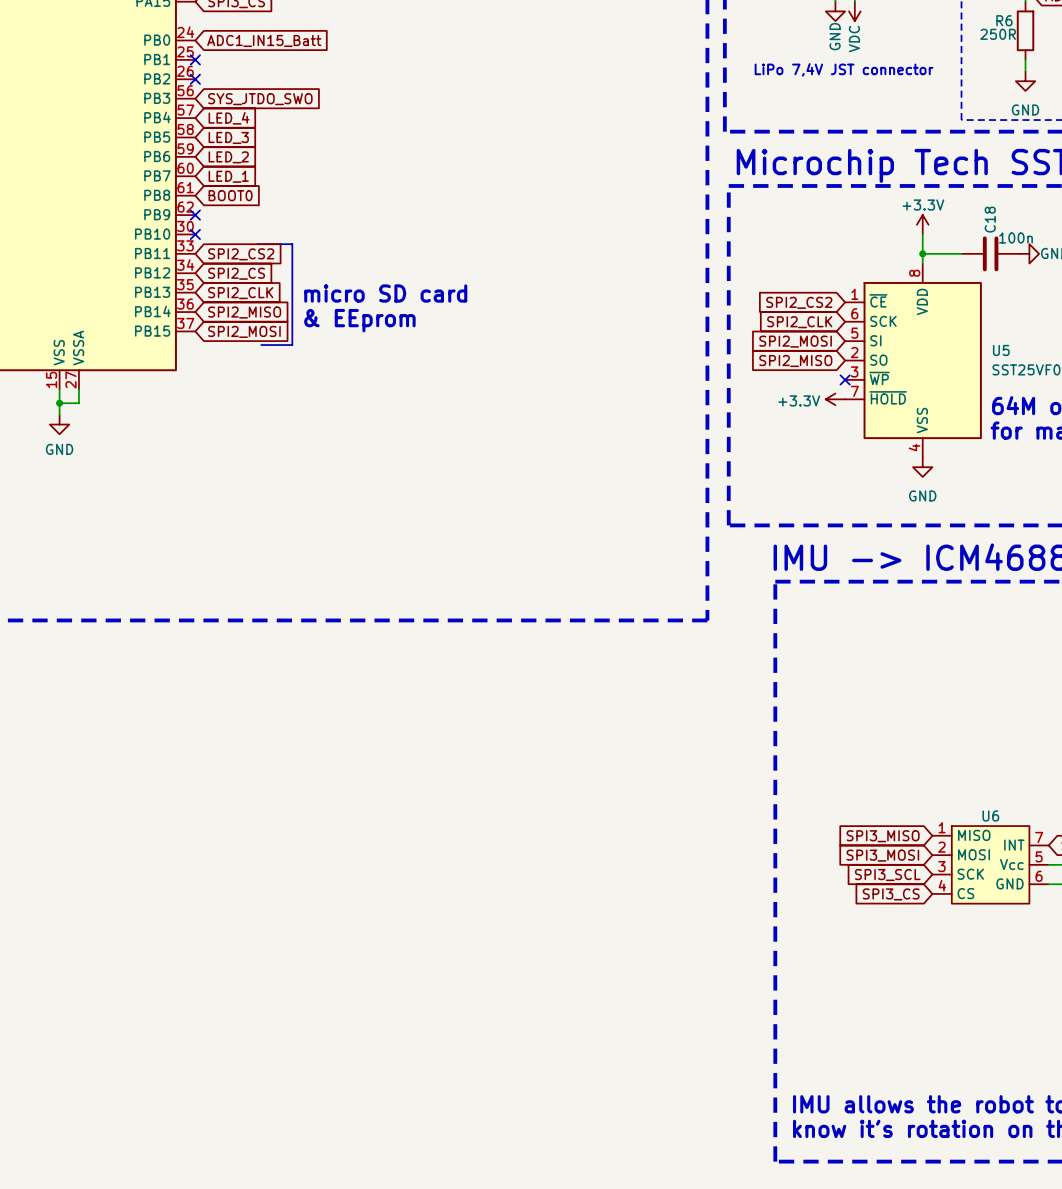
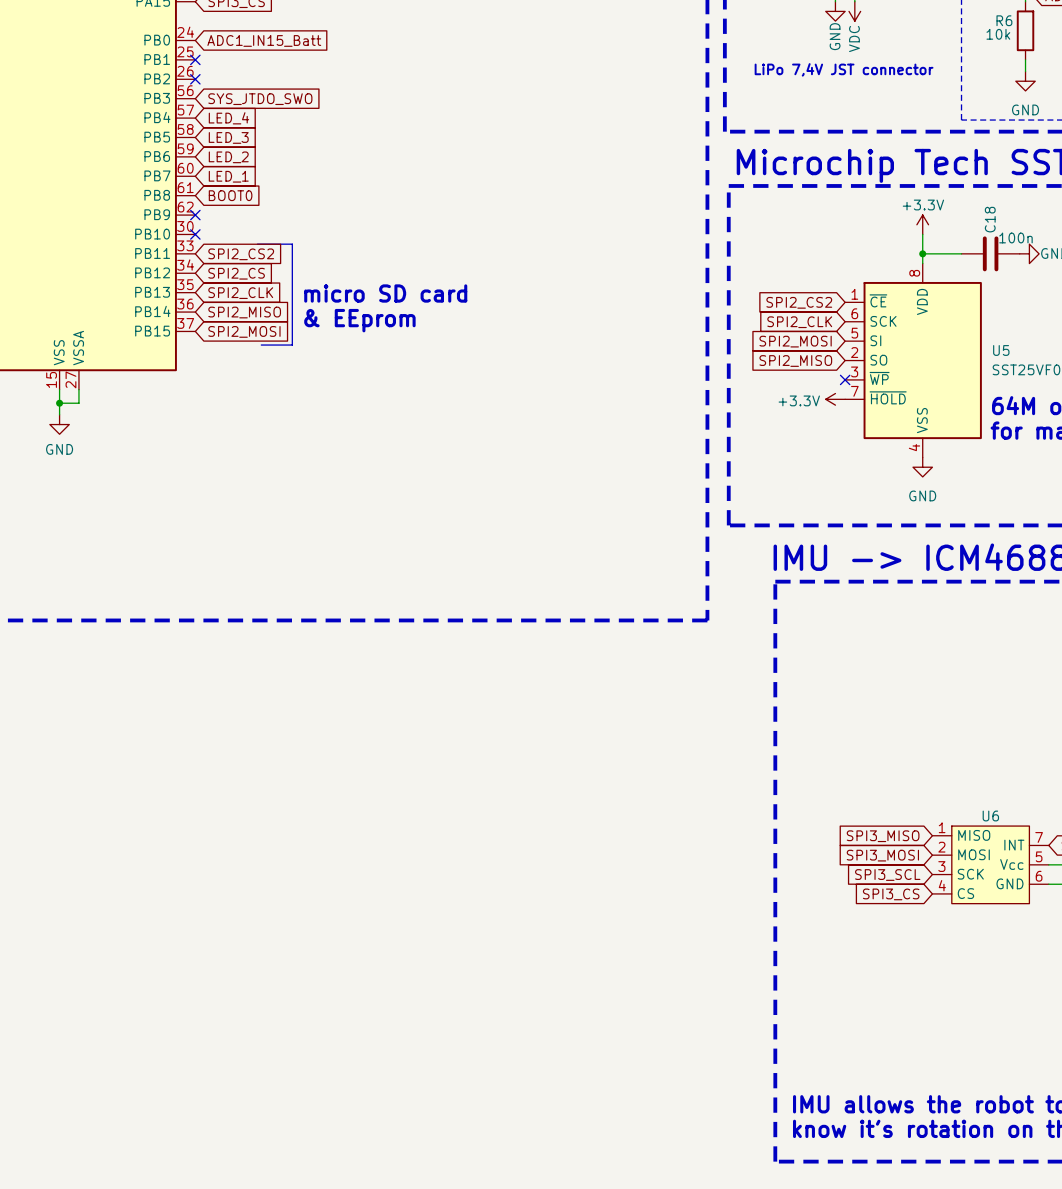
R6 value: 250R (998, 34) -> 10k (998, 34)

